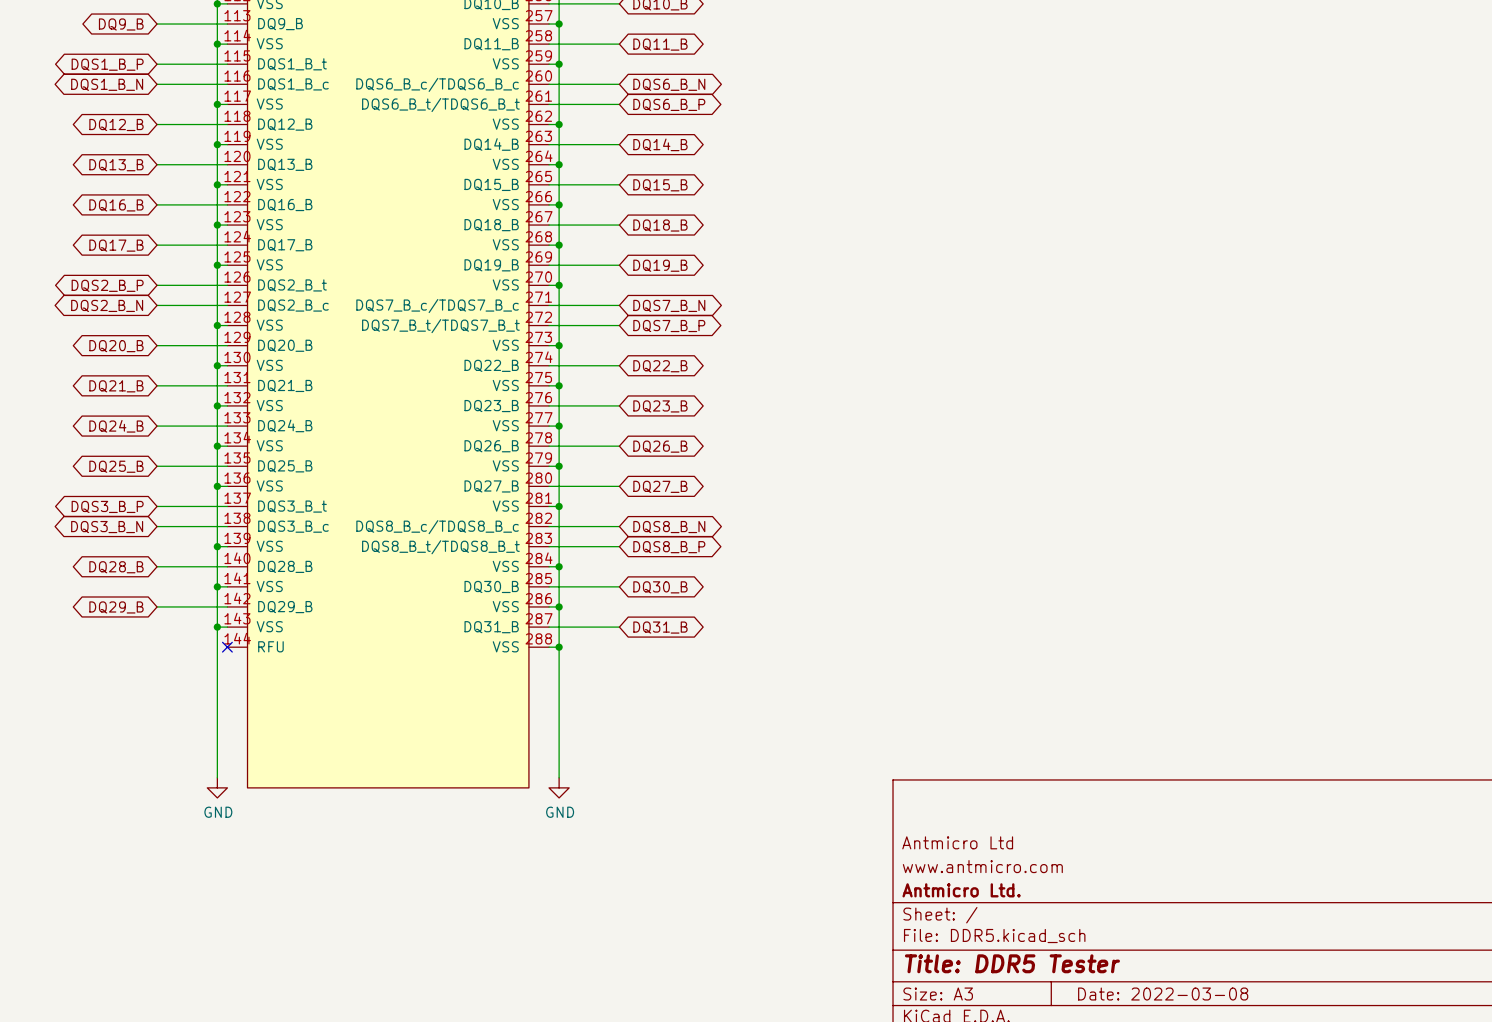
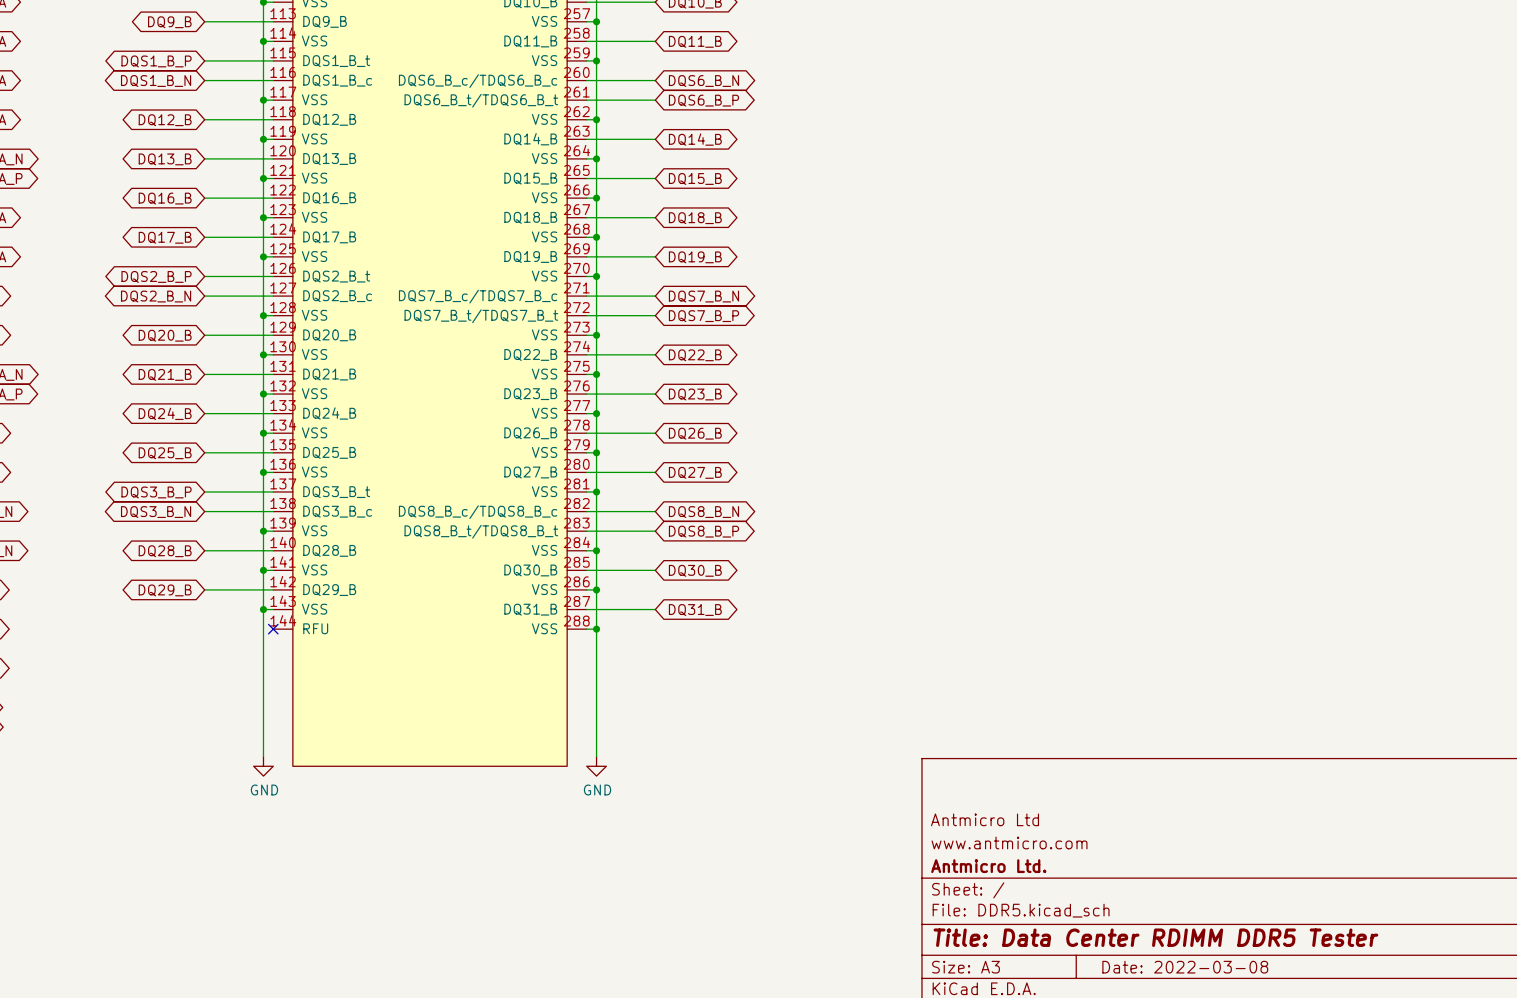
title block: Title: DDR5 Tester (1012, 963) -> Title: Data Center RDIMM DDR5 Tester (1155, 937)

